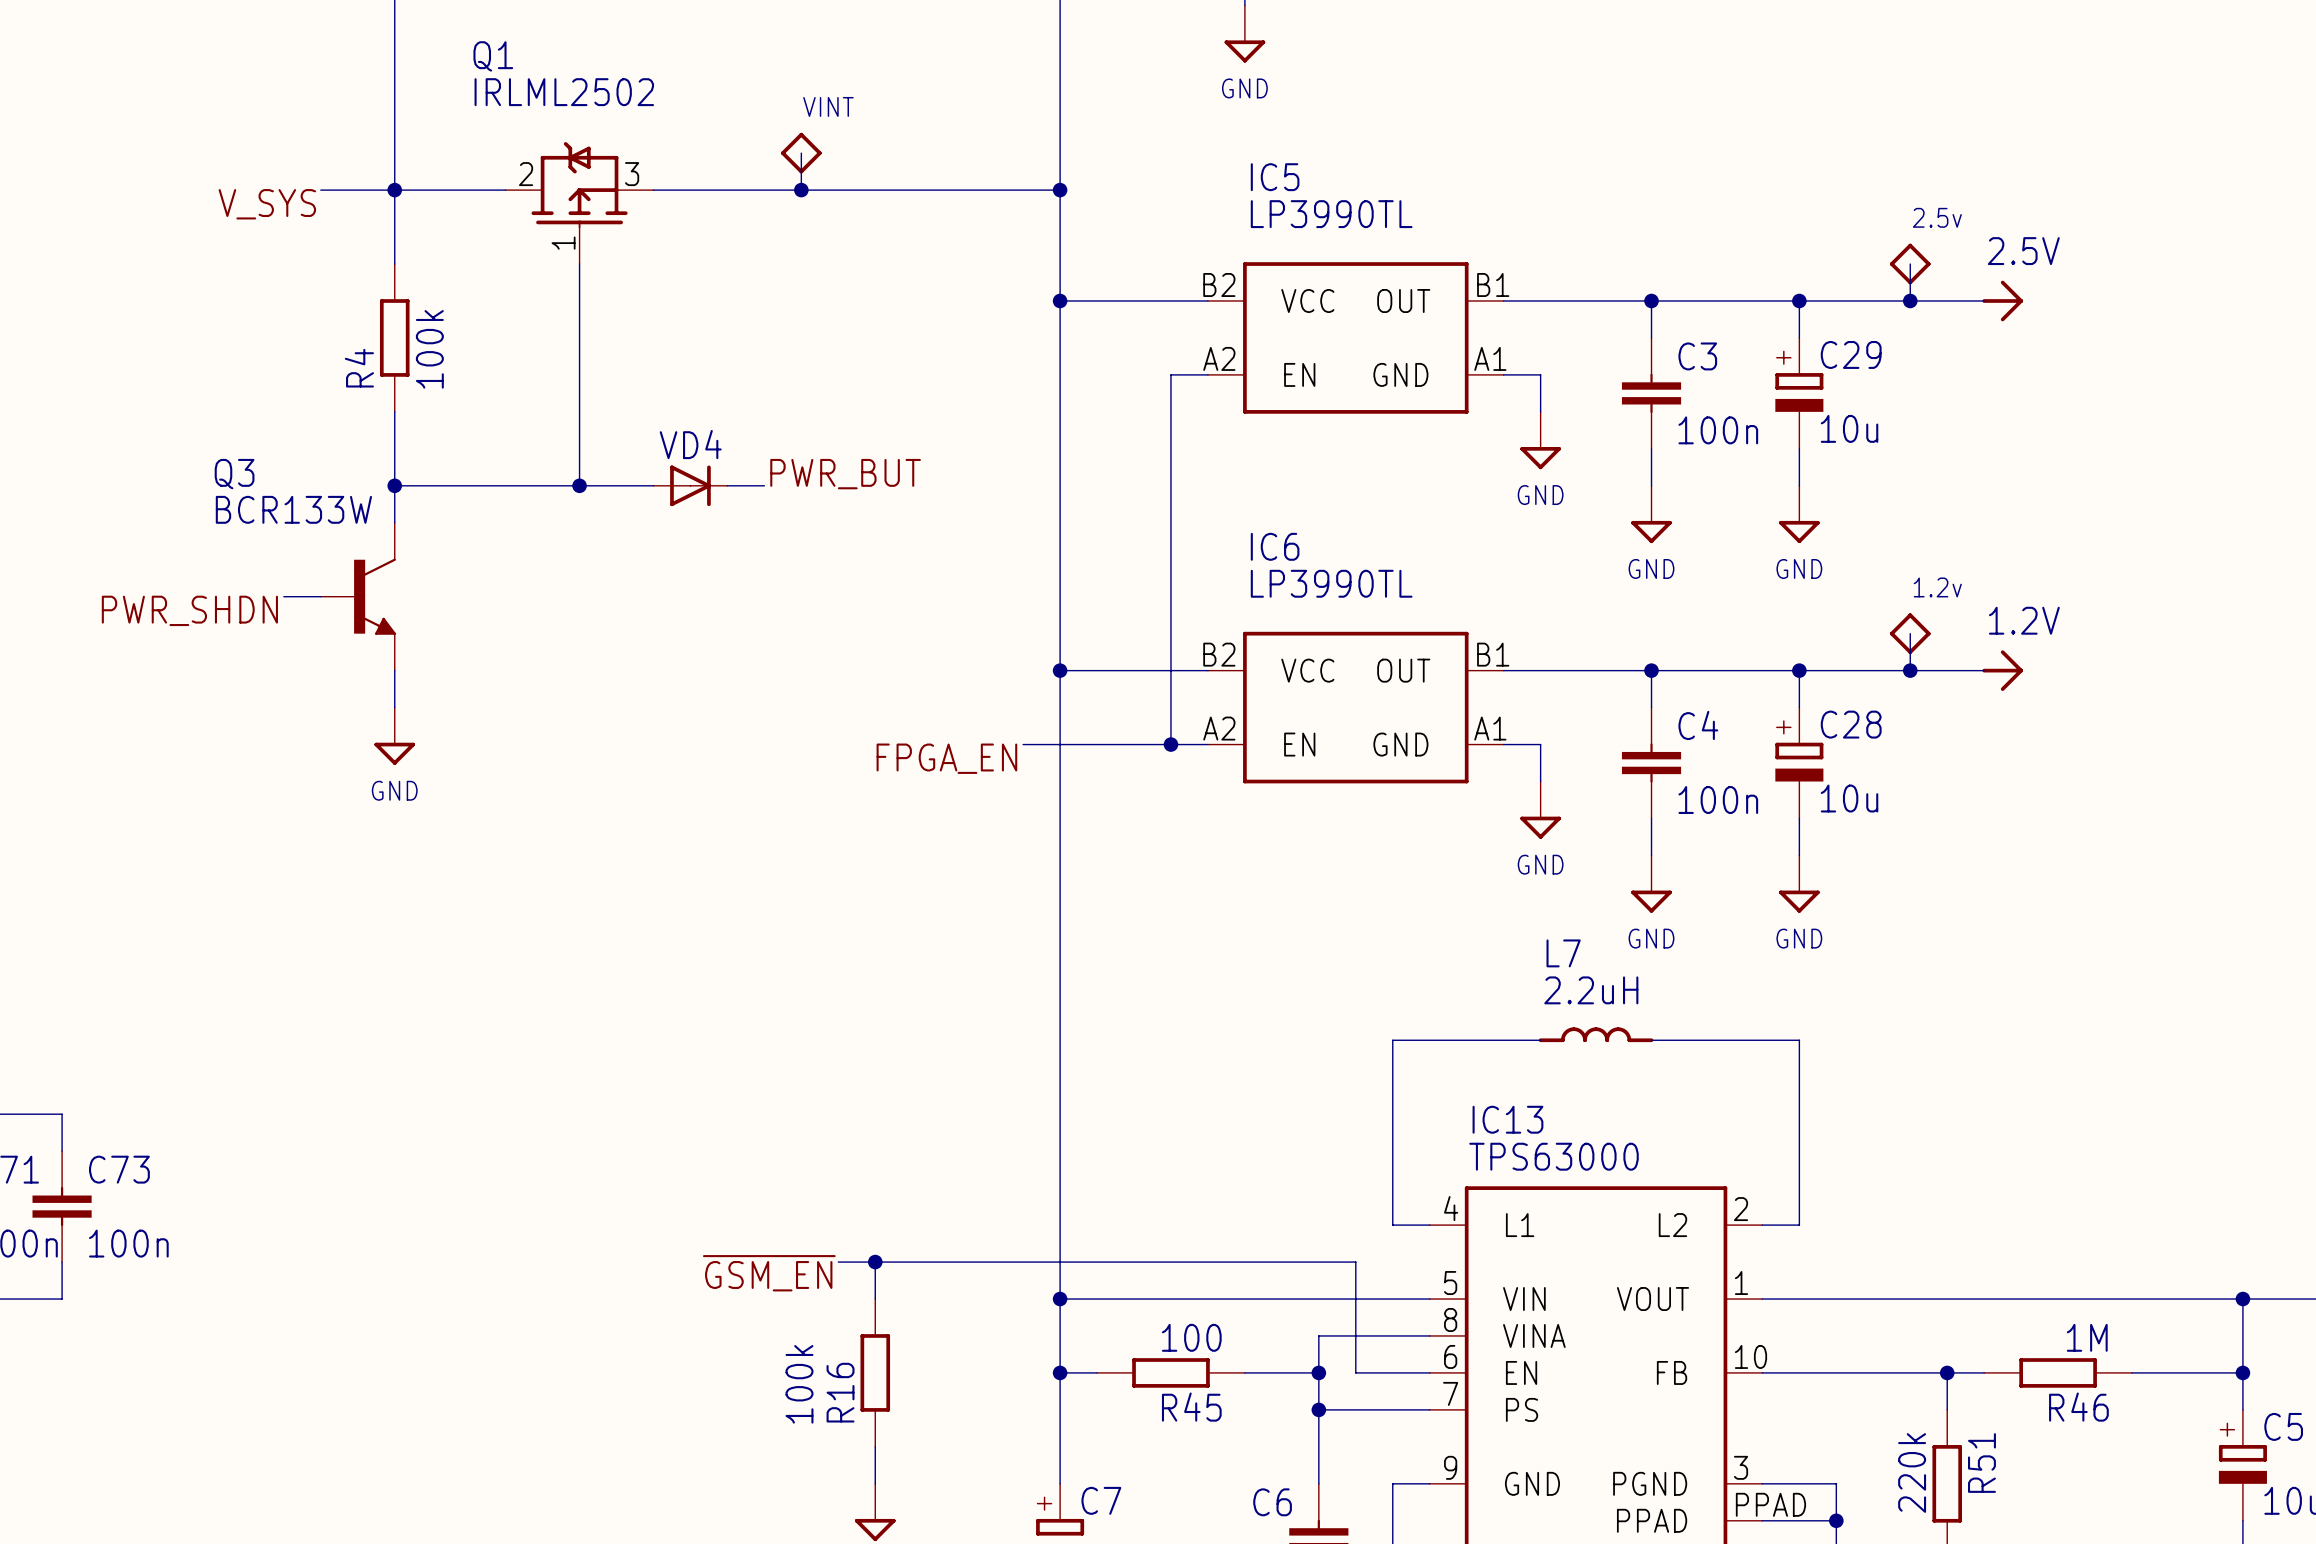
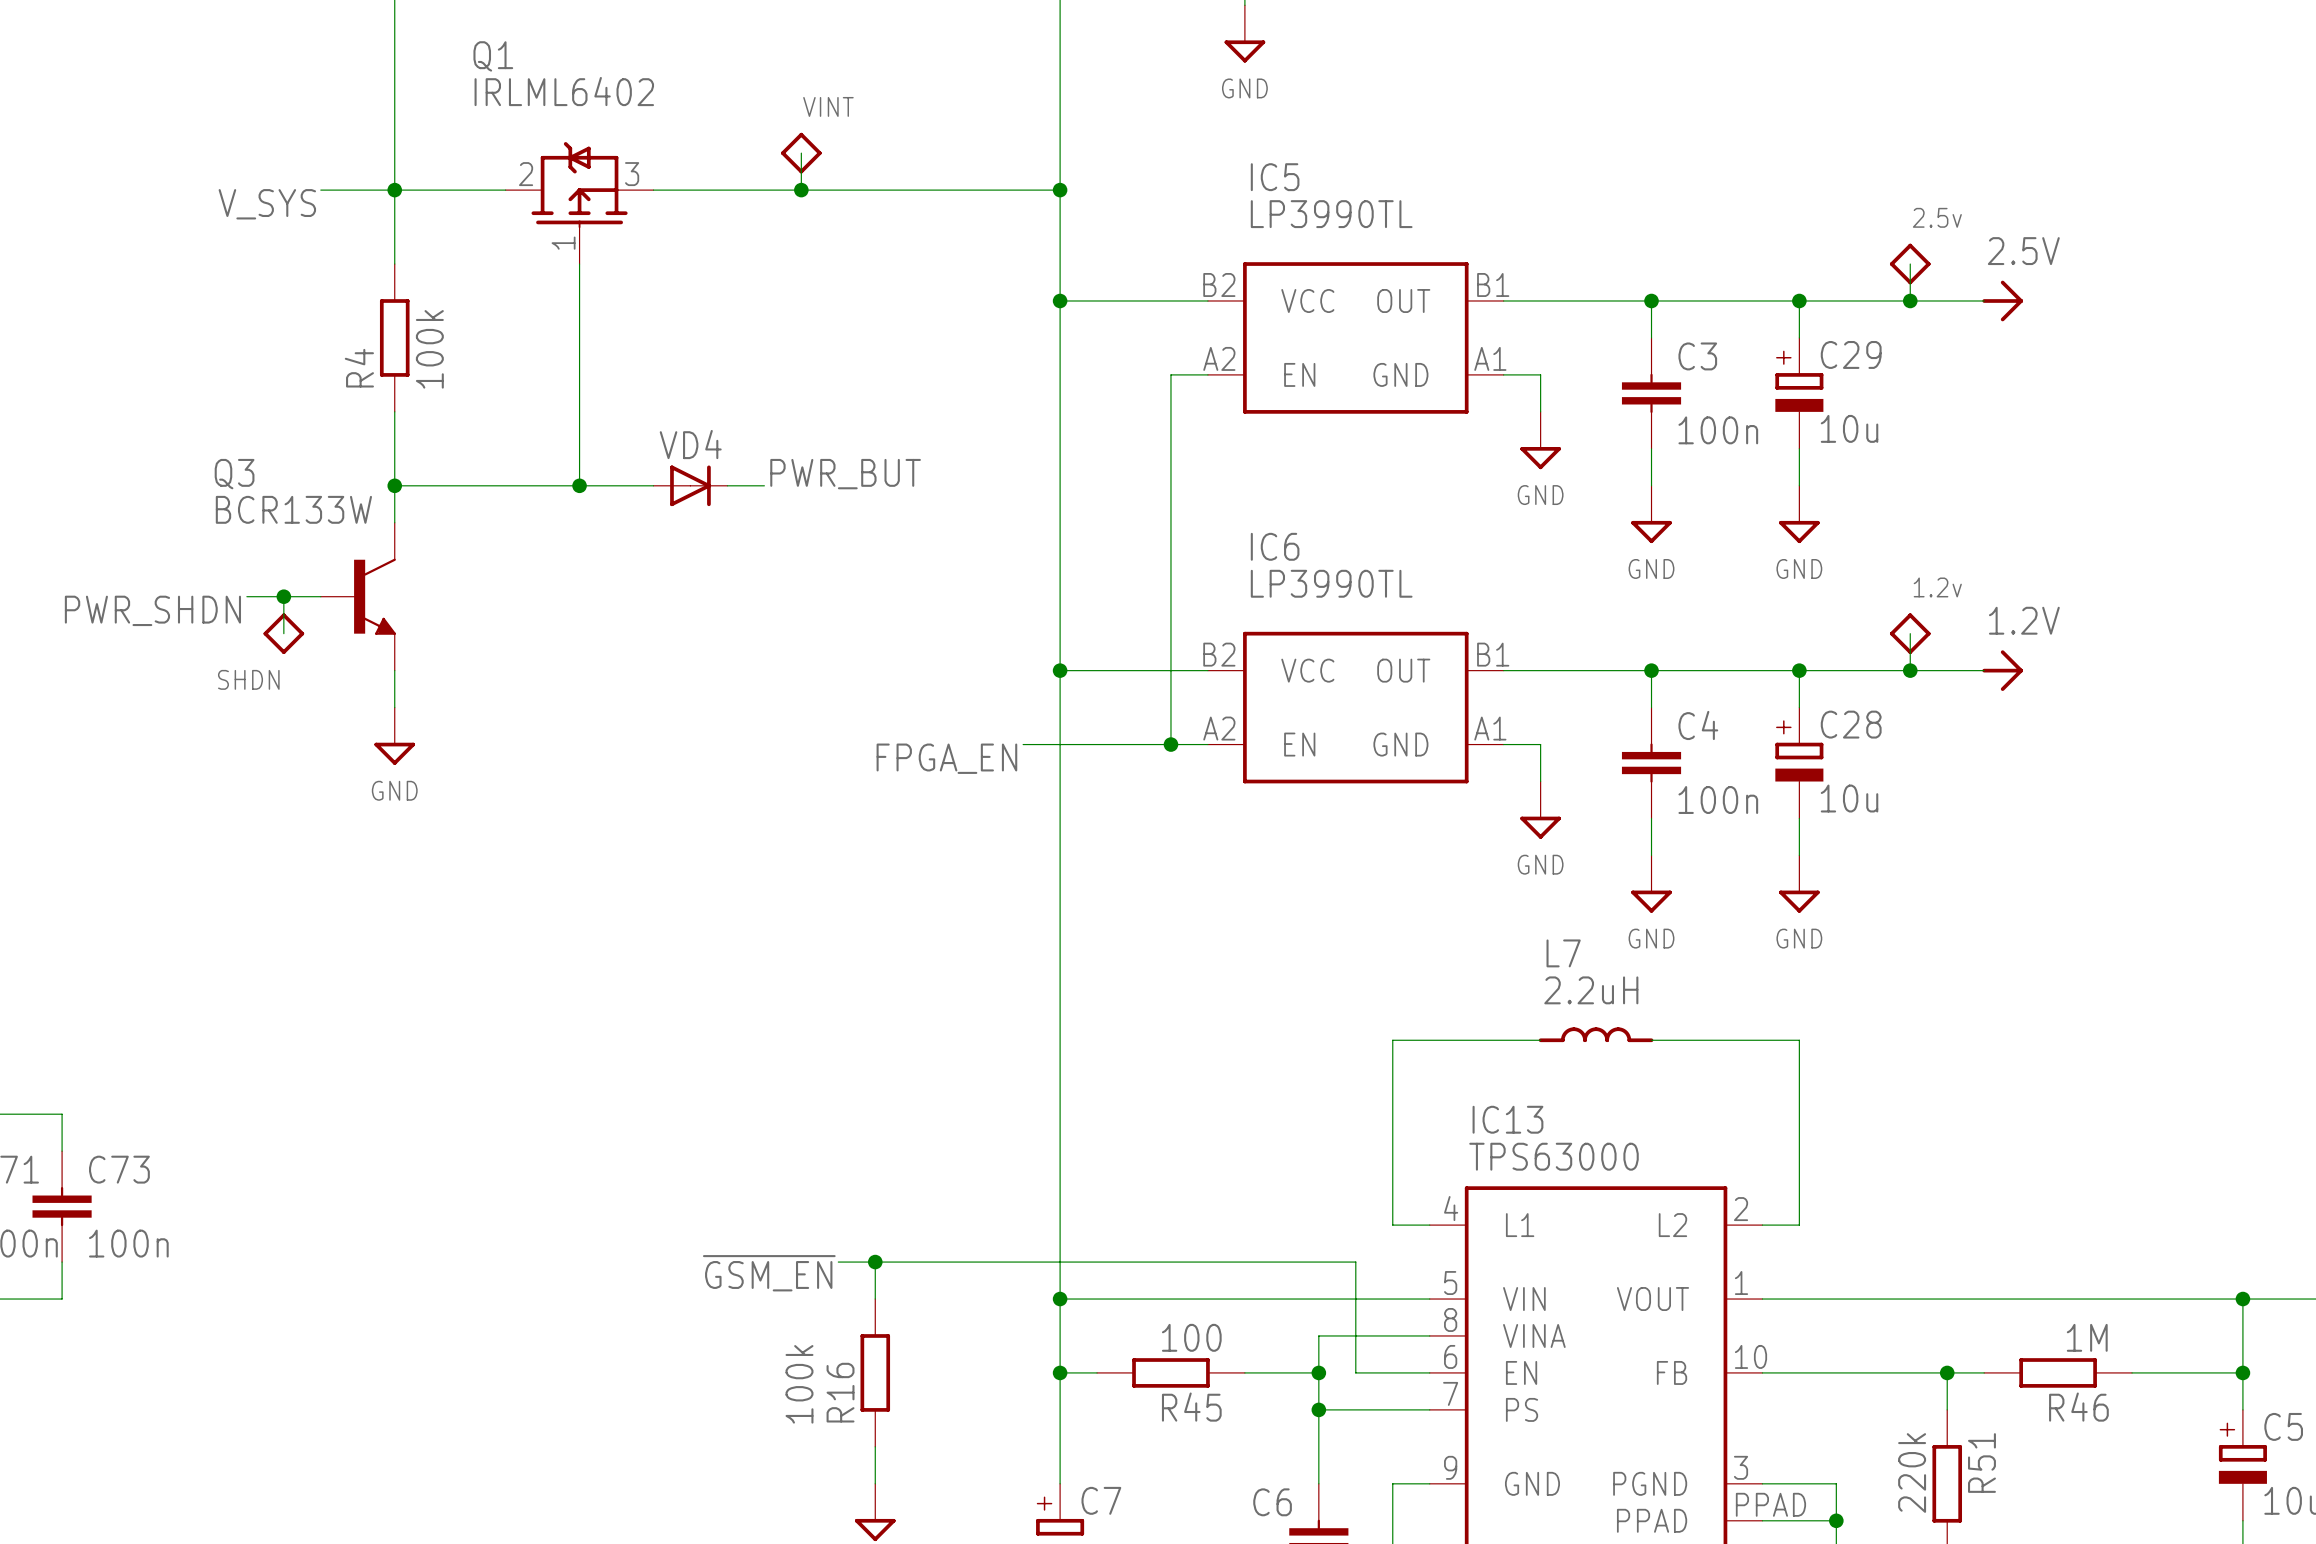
Q1 value: IRLML2502 (564, 92) -> IRLML6402 (564, 91)
wire: none -> (246, 596) (283, 596) (283, 633)
junction: none -> (283, 596)
label position: PWR_SHDN (189, 610) -> PWR_SHDN (152, 610)
part: none -> SHDN (283, 633)

